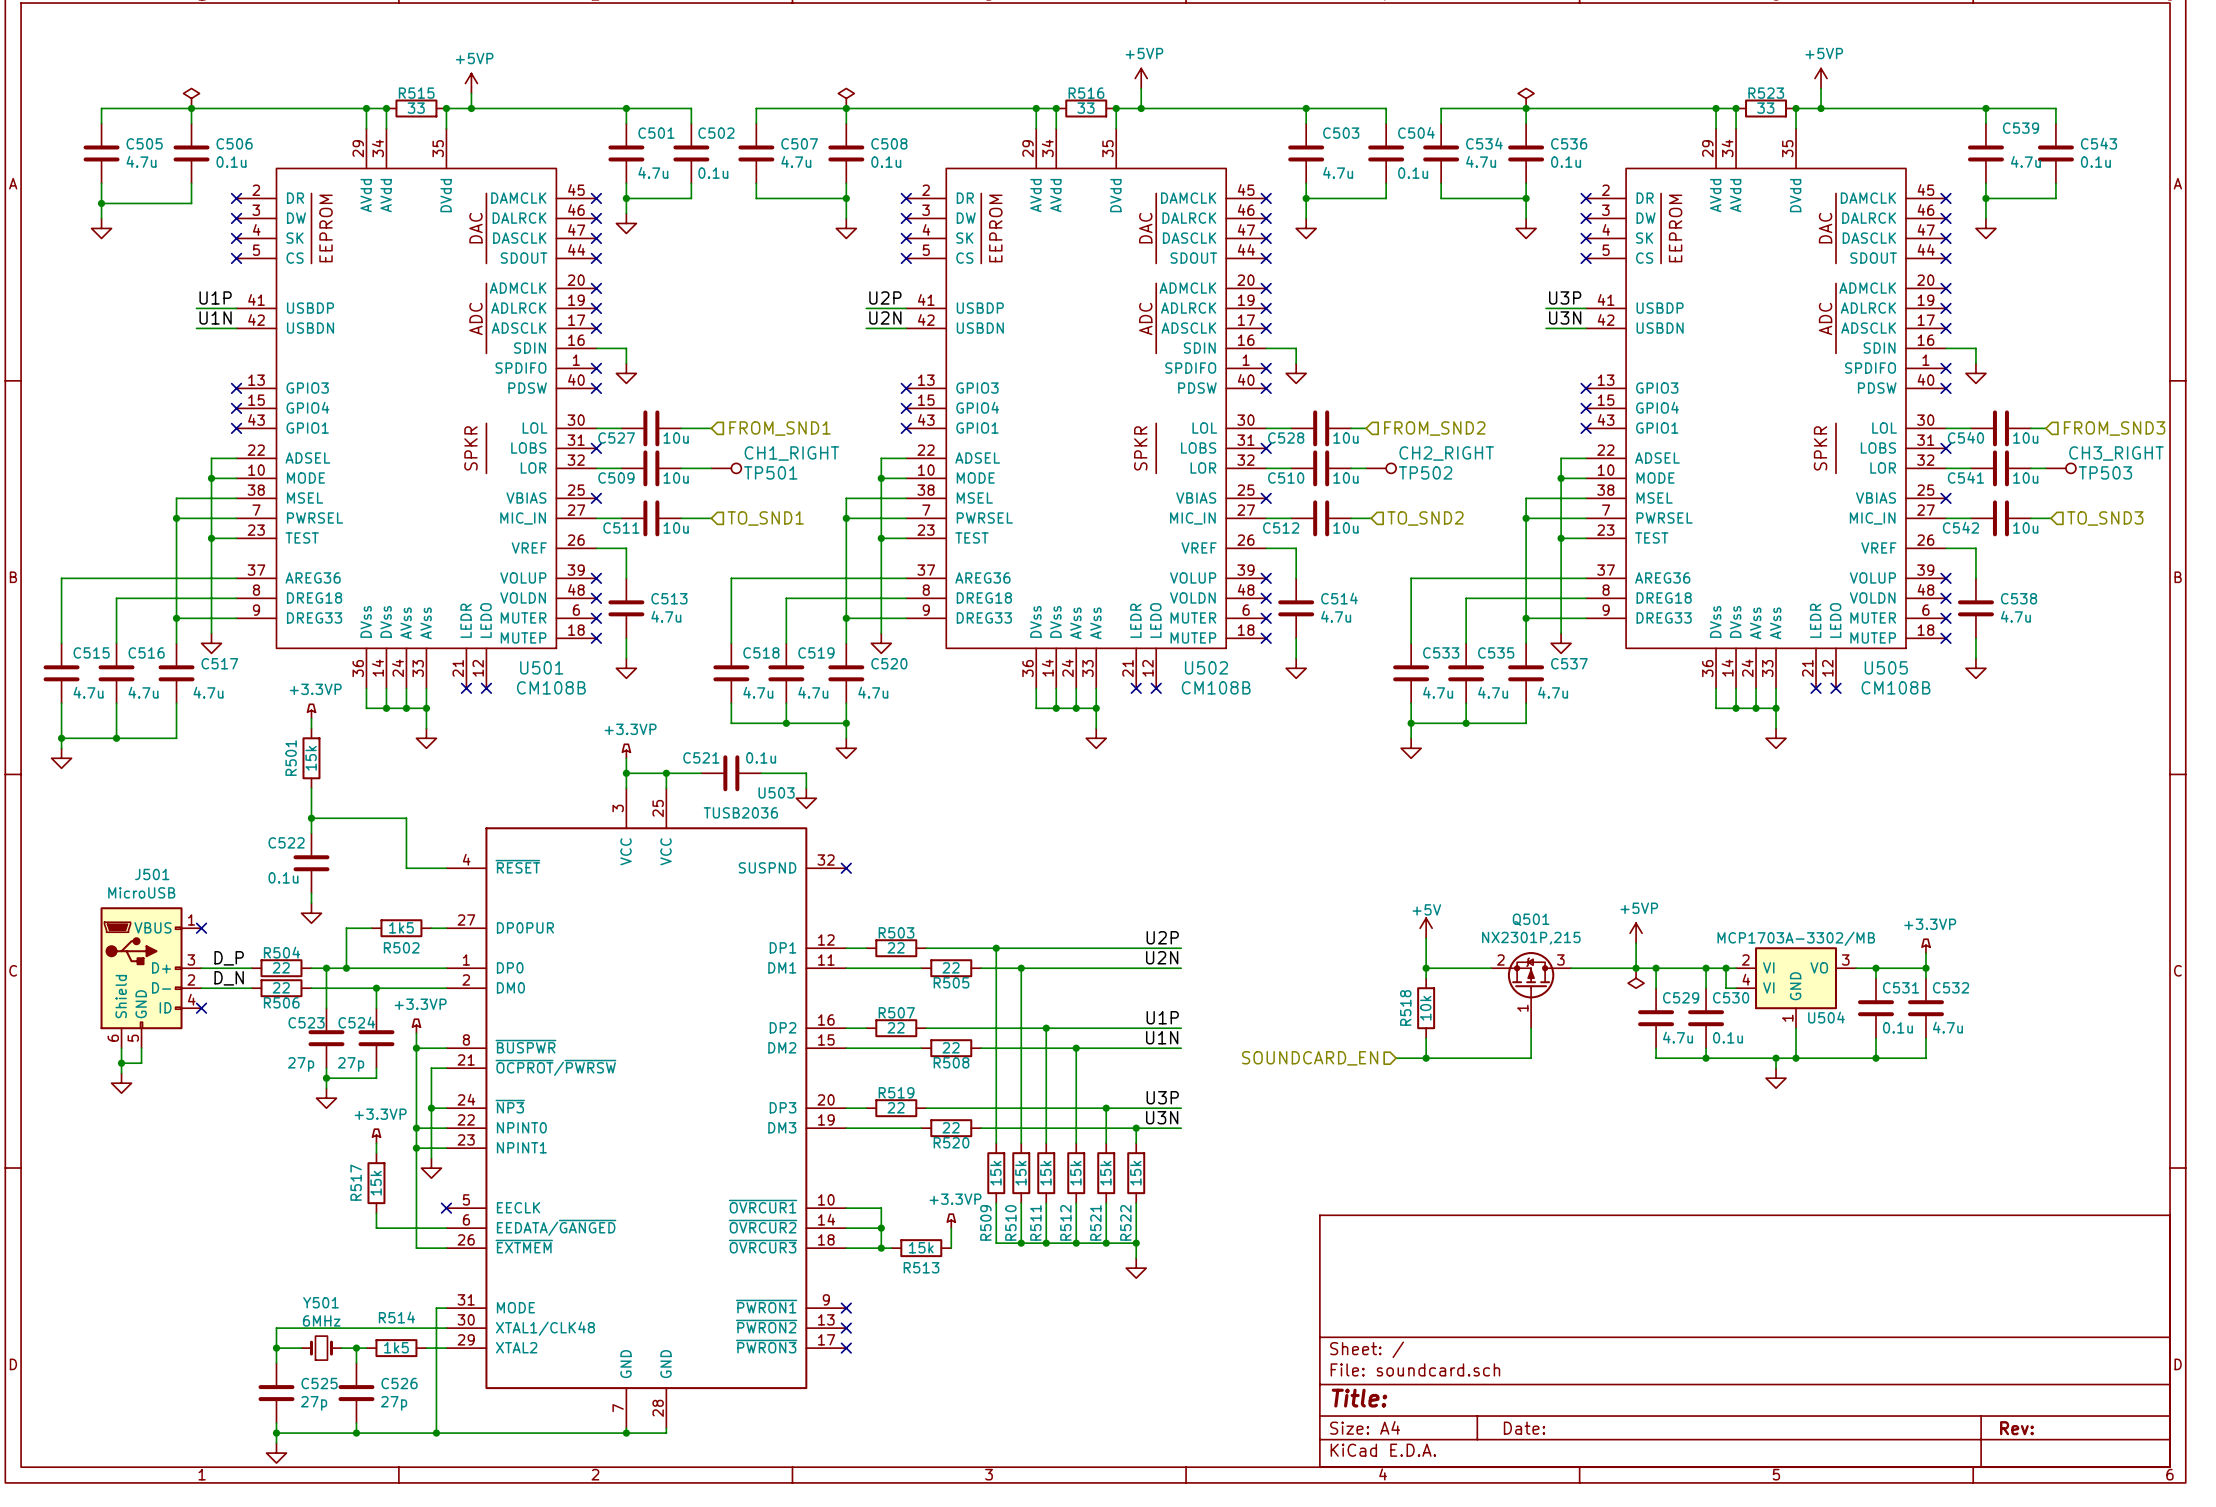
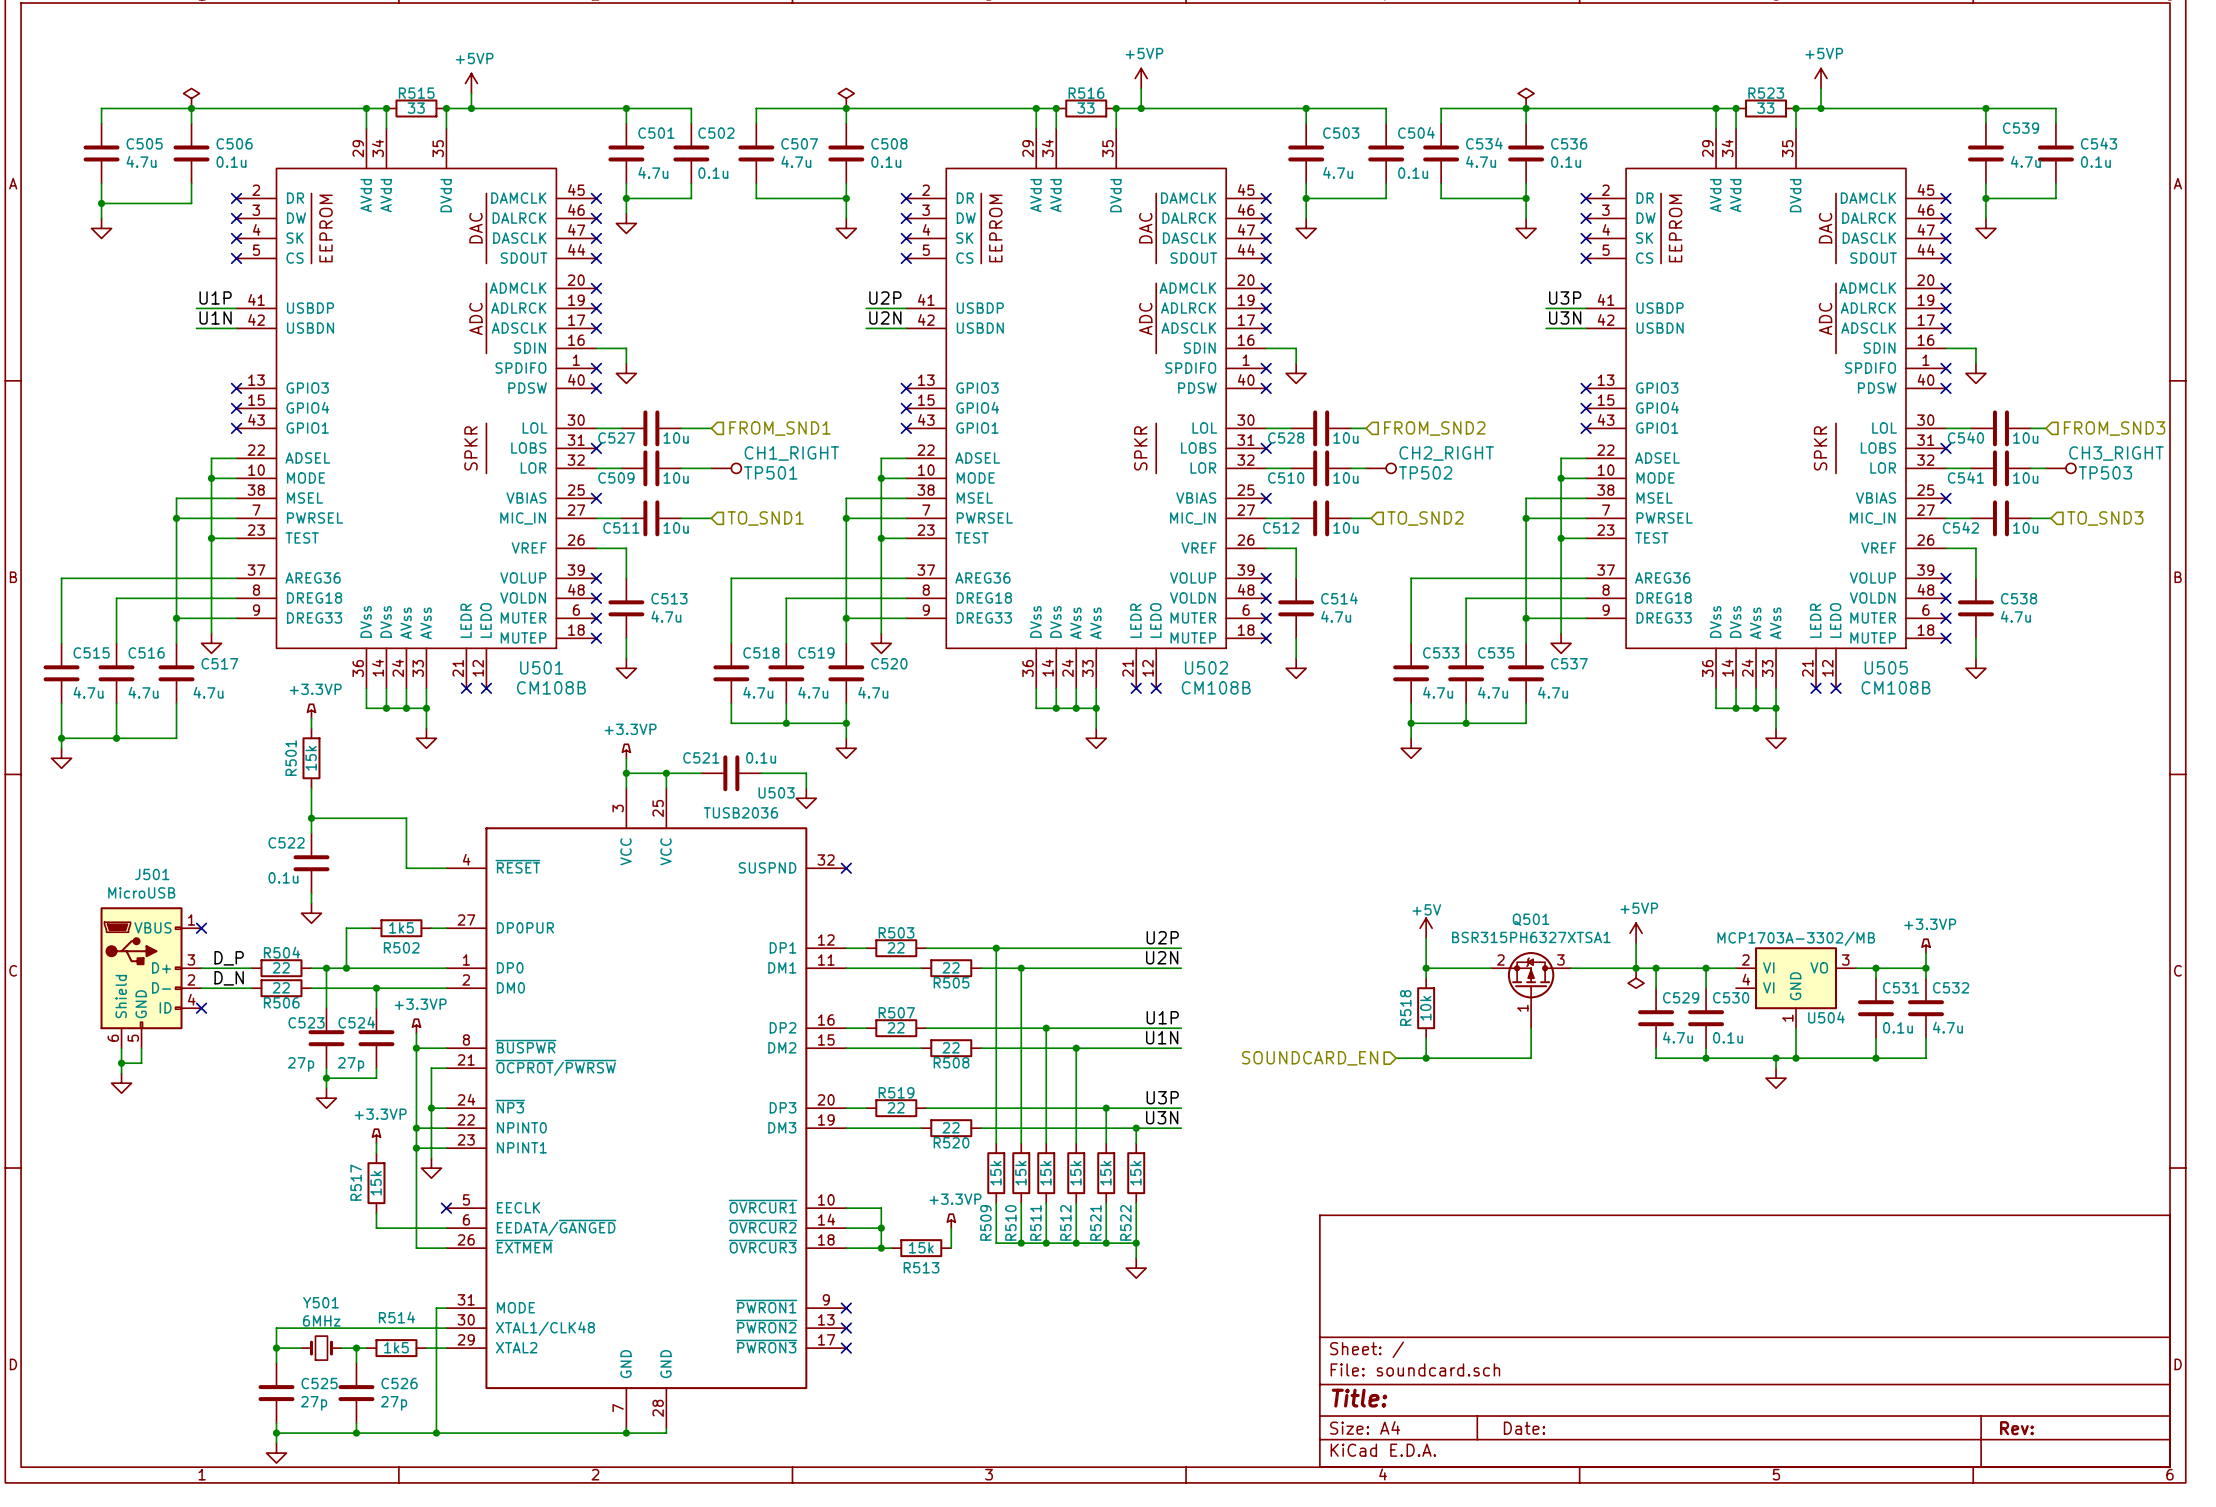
Q501 value: NX2301P,215 (1531, 938) -> BSR315PH6327XTSA1 (1531, 937)
wire: (1726, 968) (1726, 988) (1736, 988) -> none
junction: (1726, 968) -> none

